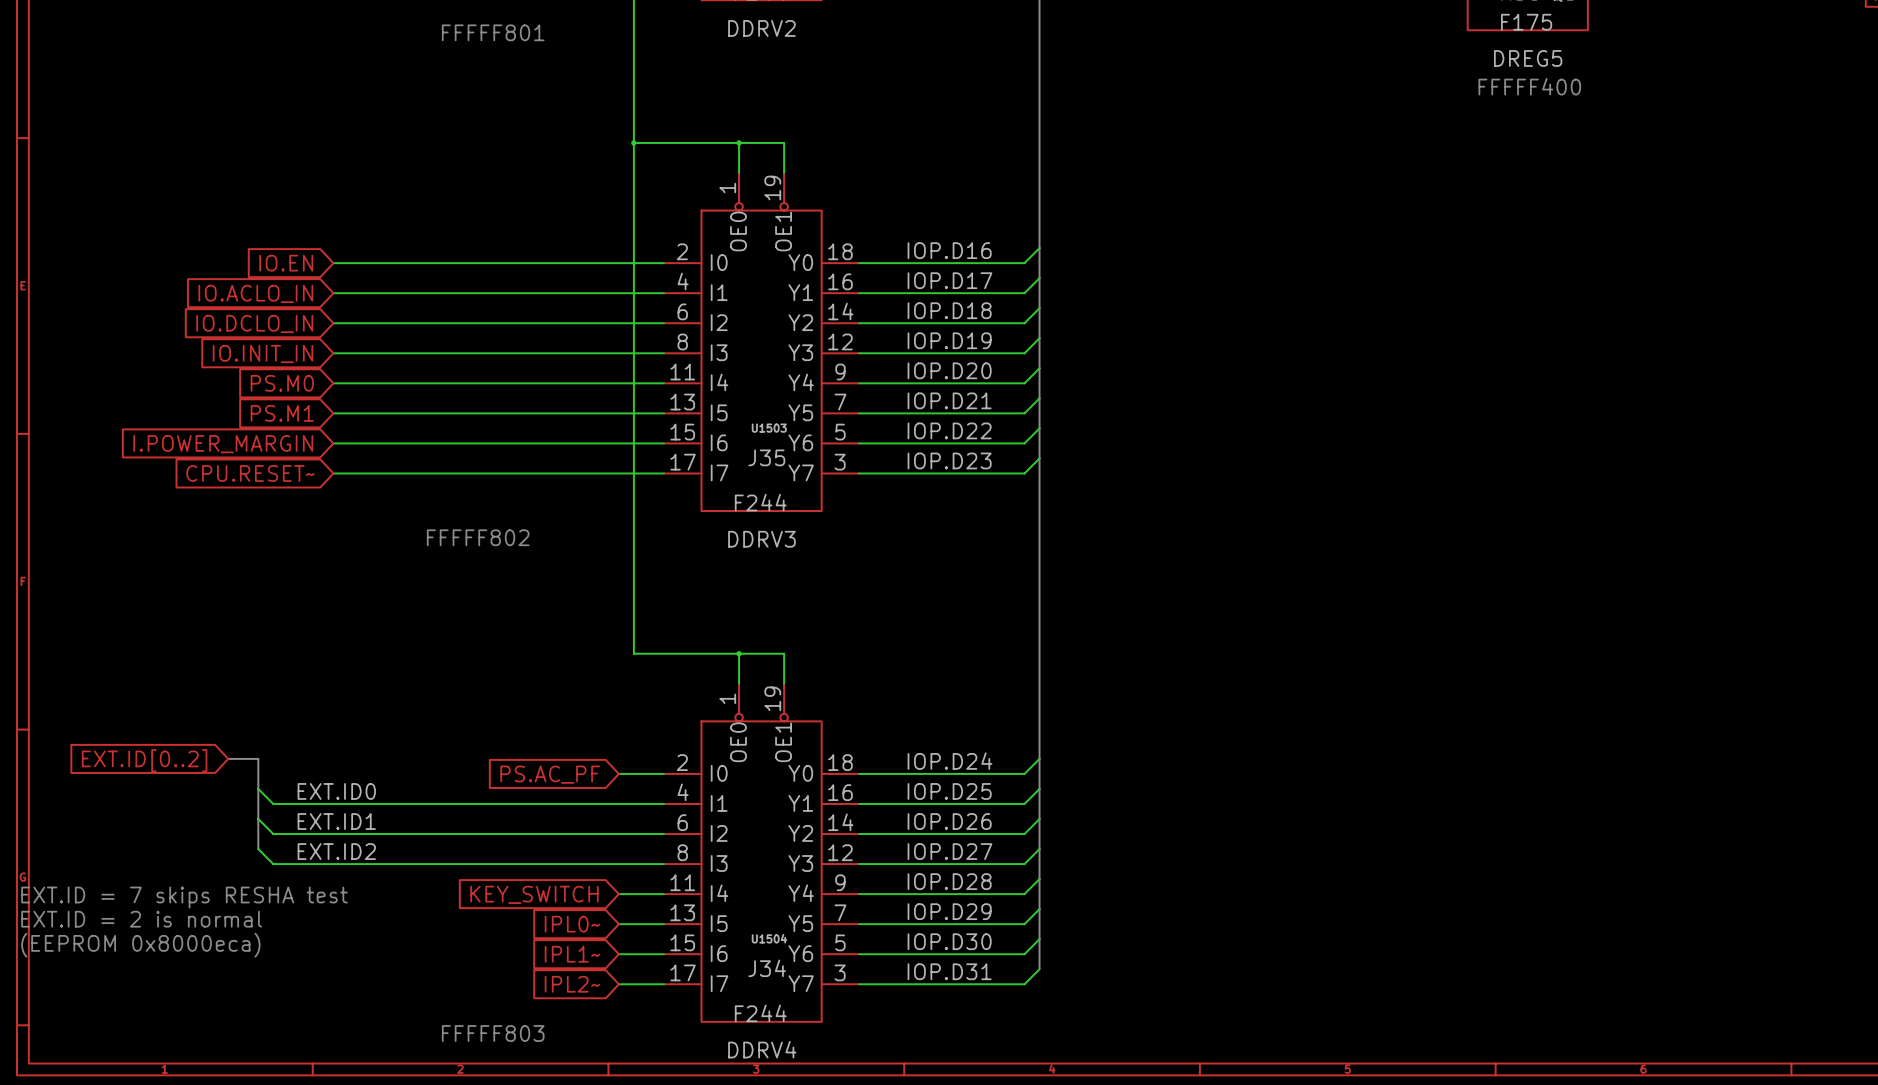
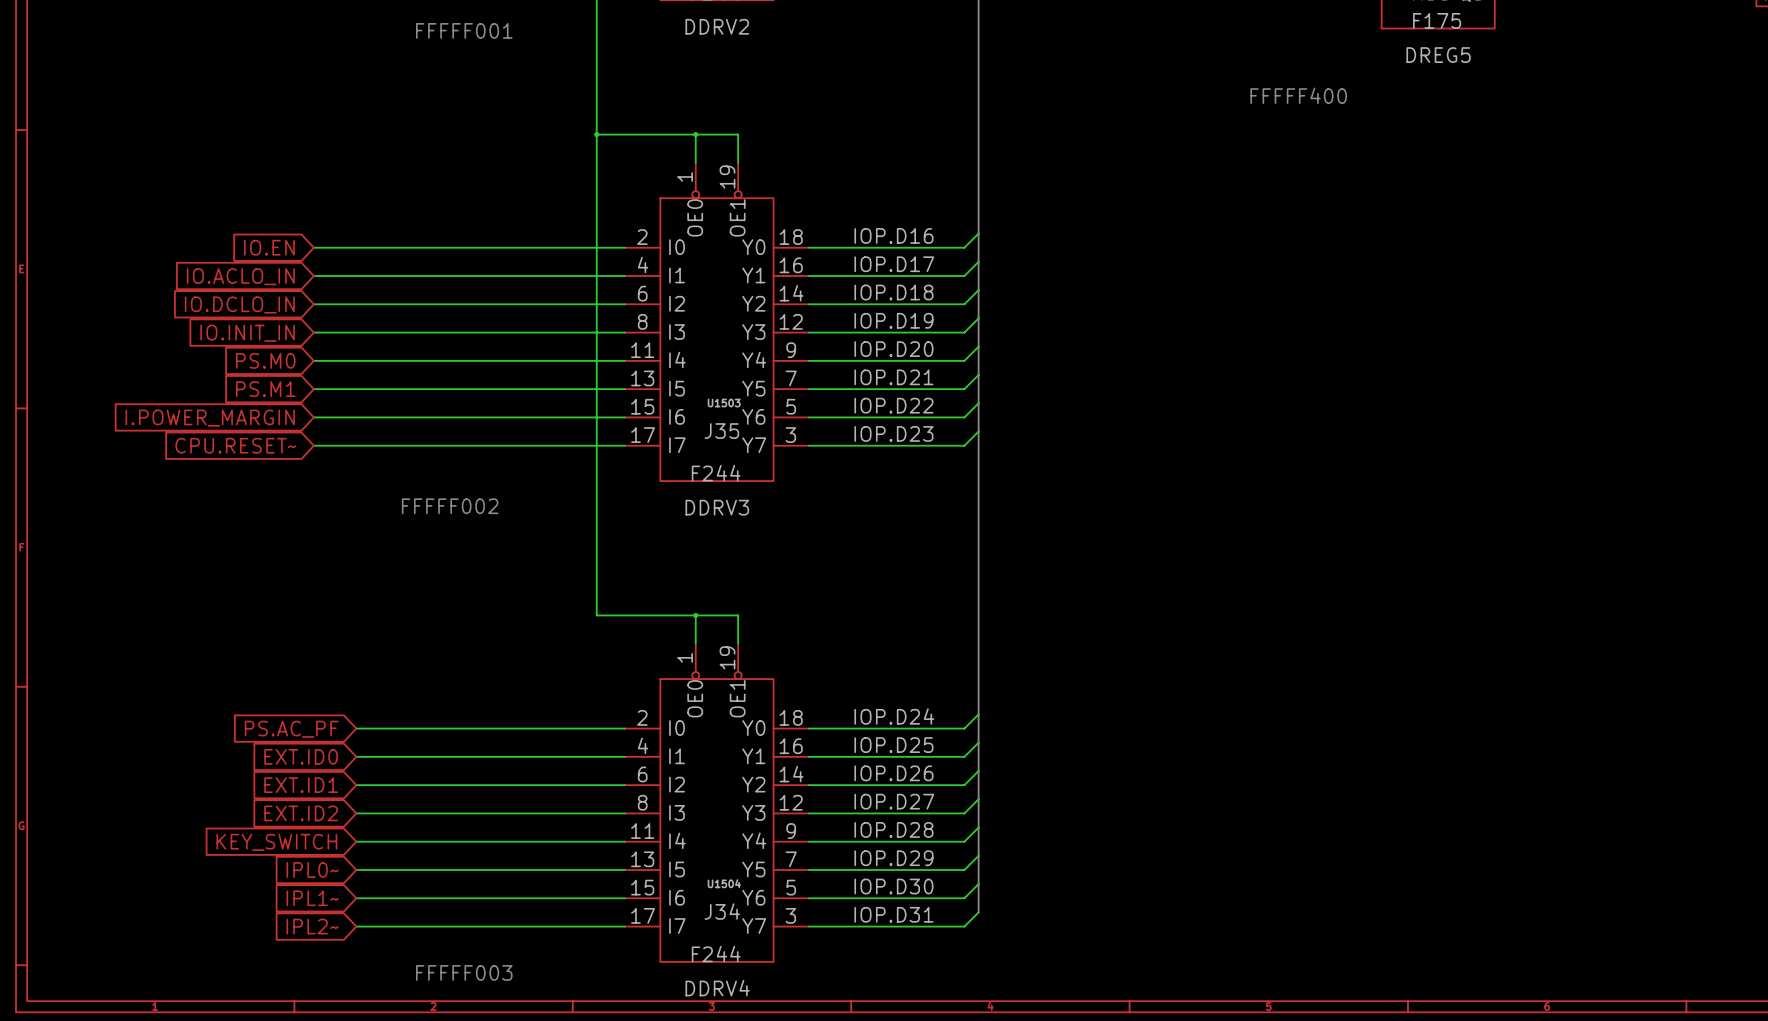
text: FFFFF801 (493, 32) -> FFFFF001 (464, 30)
text: FFFFF400 (1529, 86) -> none
text: none -> FFFFF400 (1298, 95)
text: FFFFF802 (478, 537) -> FFFFF002 (450, 506)
bus: (228, 758) (258, 758) (258, 849) -> none
global label: EXT.ID[0..2] (144, 760) -> none
wire: none -> (356, 728) (582, 728)
global label: none -> PS.AC_PF (291, 729)
global label: PS.AC_PF (550, 774) -> none
wire: (258, 788) (273, 803) (378, 803) -> none
label: EXT.ID0 (336, 791) -> none
global label: none -> EXT.ID0 (301, 756)
wire: (258, 819) (273, 834) (378, 834) -> none
label: EXT.ID1 (336, 821) -> none
global label: none -> EXT.ID1 (301, 785)
wire: (258, 849) (273, 864) (378, 864) -> none
label: EXT.ID2 (336, 851) -> none
global label: none -> EXT.ID2 (301, 813)
global label: none -> KEY_SWITCH (276, 842)
wire: none -> (356, 841) (582, 841)
global label: KEY_SWITCH (534, 894) -> none
text: EXT.ID = 7 skips RESHA test (184, 897) -> none
text: EXT.ID = 2 is normal (141, 919) -> none
global label: none -> IPL0~ (312, 869)
wire: none -> (356, 869) (582, 869)
global label: IPL0~ (572, 924) -> none
text: (EEPROM 0x8000eca) (140, 945) -> none
global label: none -> IPL1~ (312, 898)
wire: none -> (356, 898) (582, 898)
global label: IPL1~ (572, 954) -> none
global label: none -> IPL2~ (312, 926)
wire: none -> (356, 926) (582, 926)
global label: IPL2~ (572, 984) -> none
text: FFFFF803 (493, 1033) -> FFFFF003 (464, 972)

